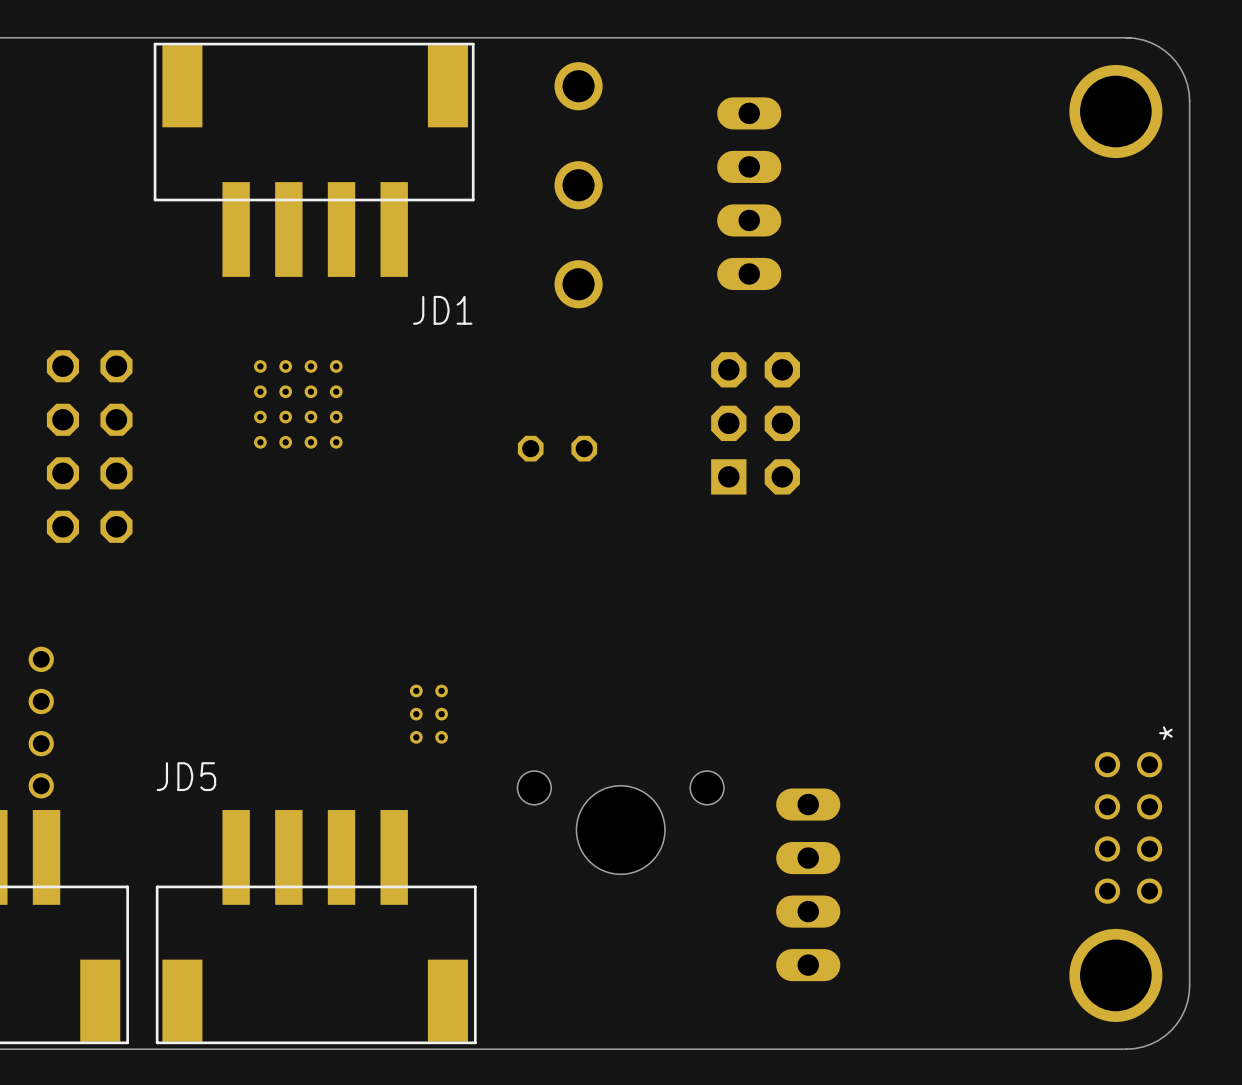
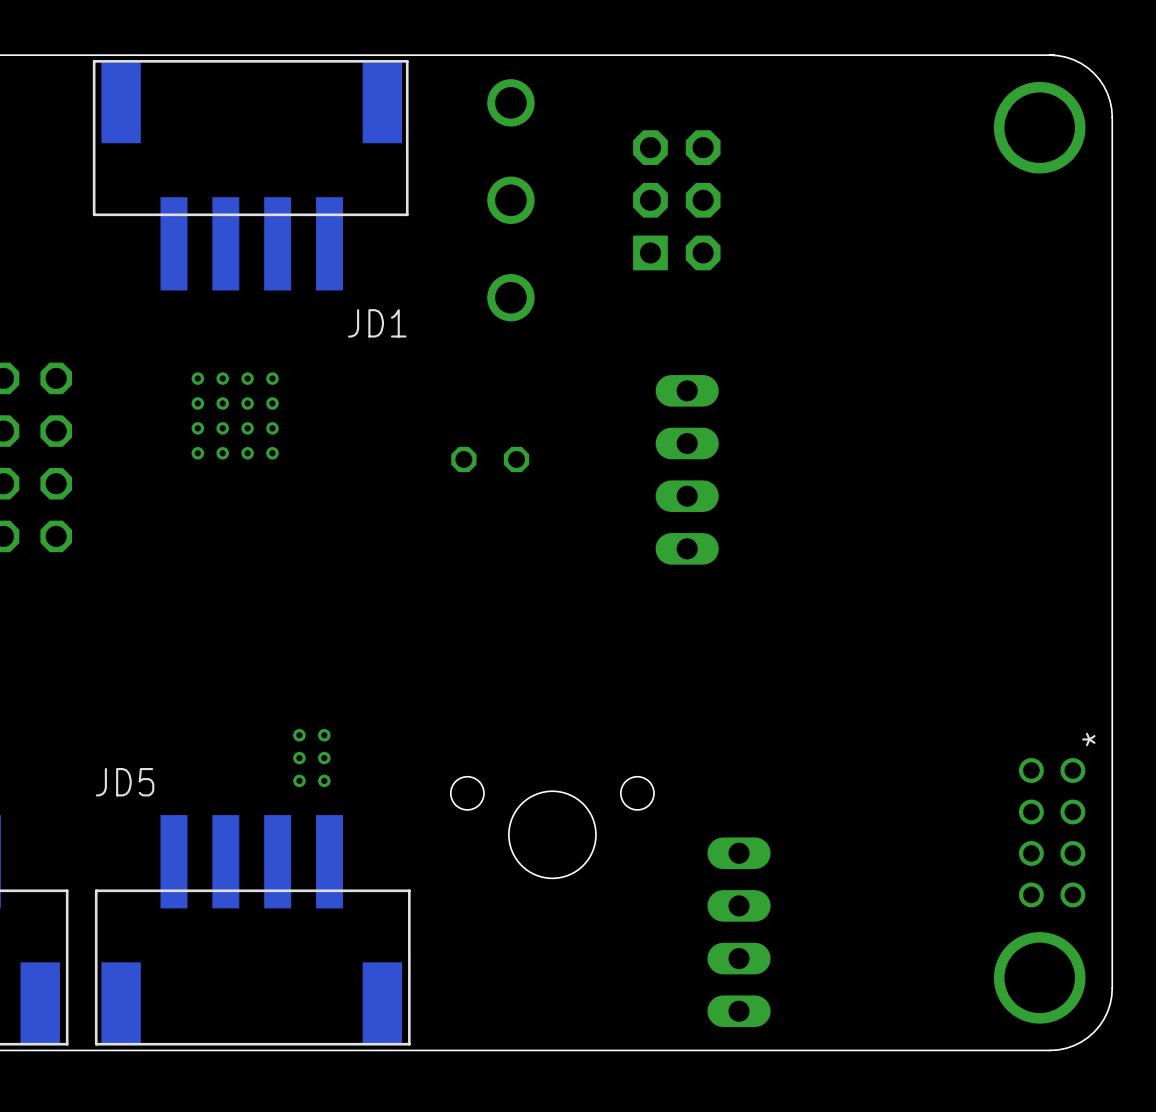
part footprint: [717, 97, 782, 291] -> [633, 130, 721, 271]
part: (755, 423) -> none
part: none -> (687, 469)
part position: (428, 714) -> (311, 758)
part position: (808, 884) -> (739, 932)

